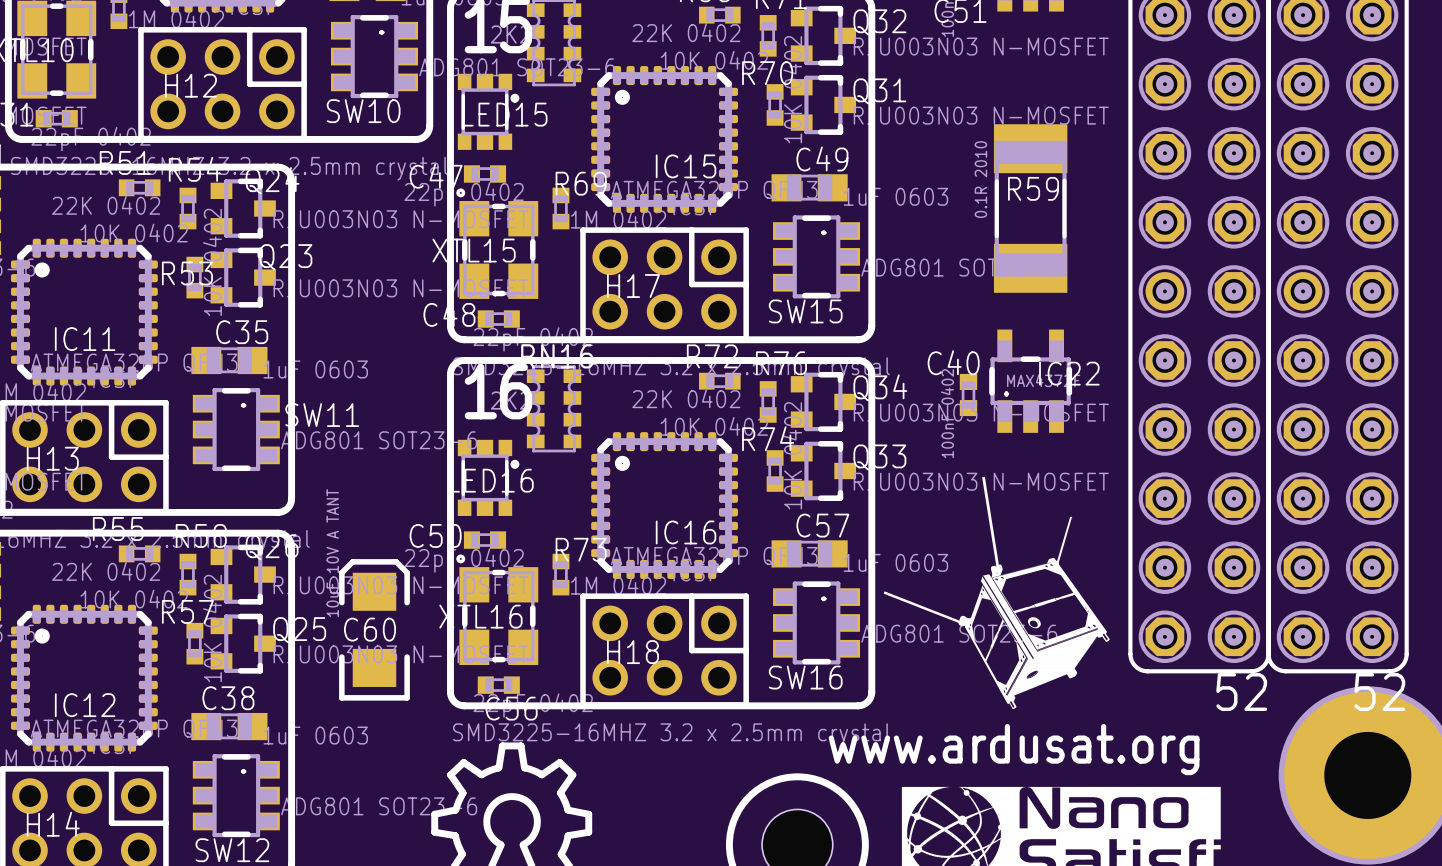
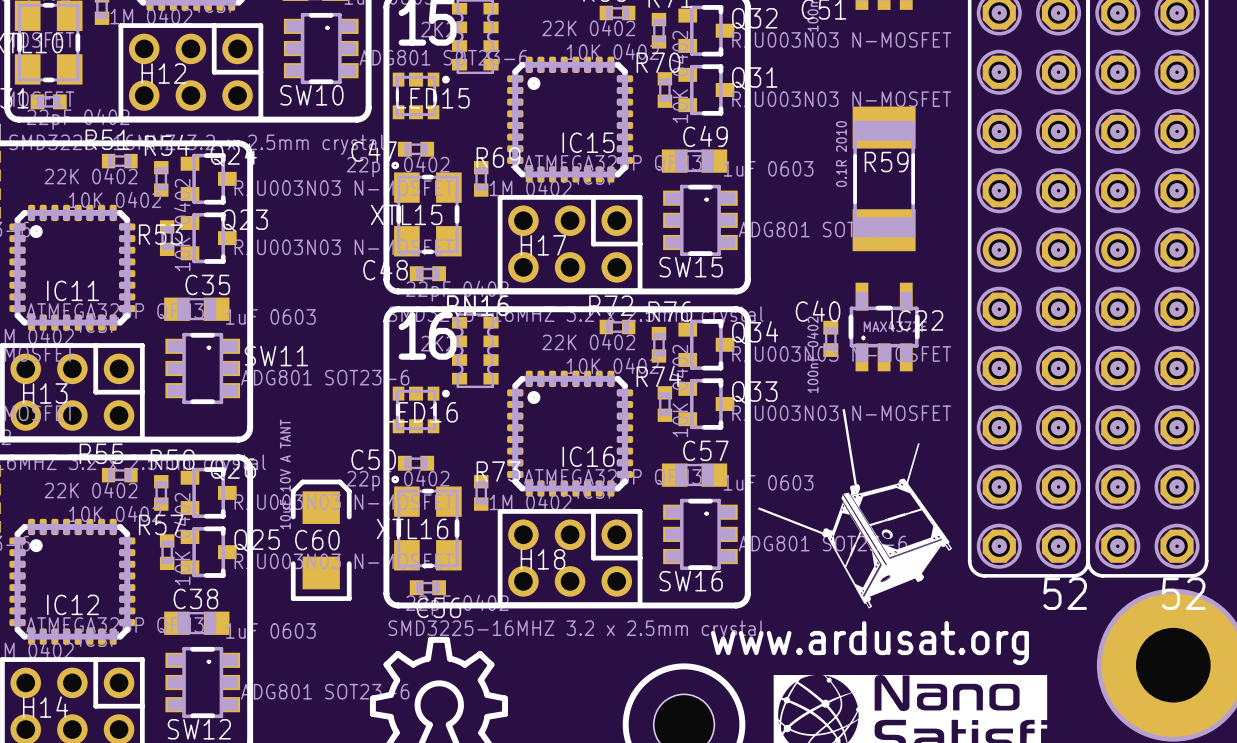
part footprint: [457, 73, 520, 150] -> [392, 72, 450, 120]
part footprint: [457, 439, 520, 516] -> [392, 386, 450, 434]

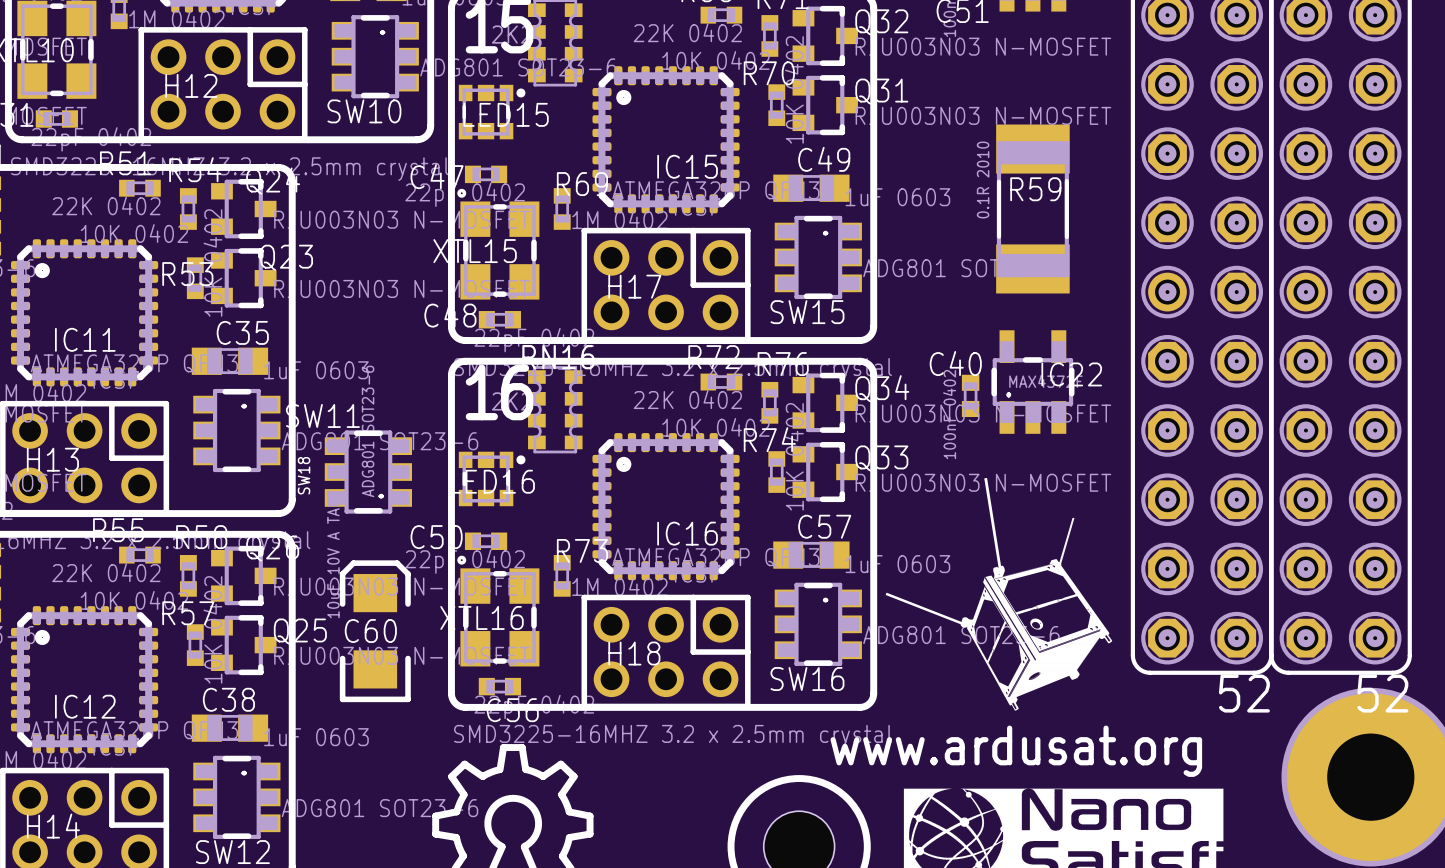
SW18: none -> ADG801 SOT23-6 (368, 472)

